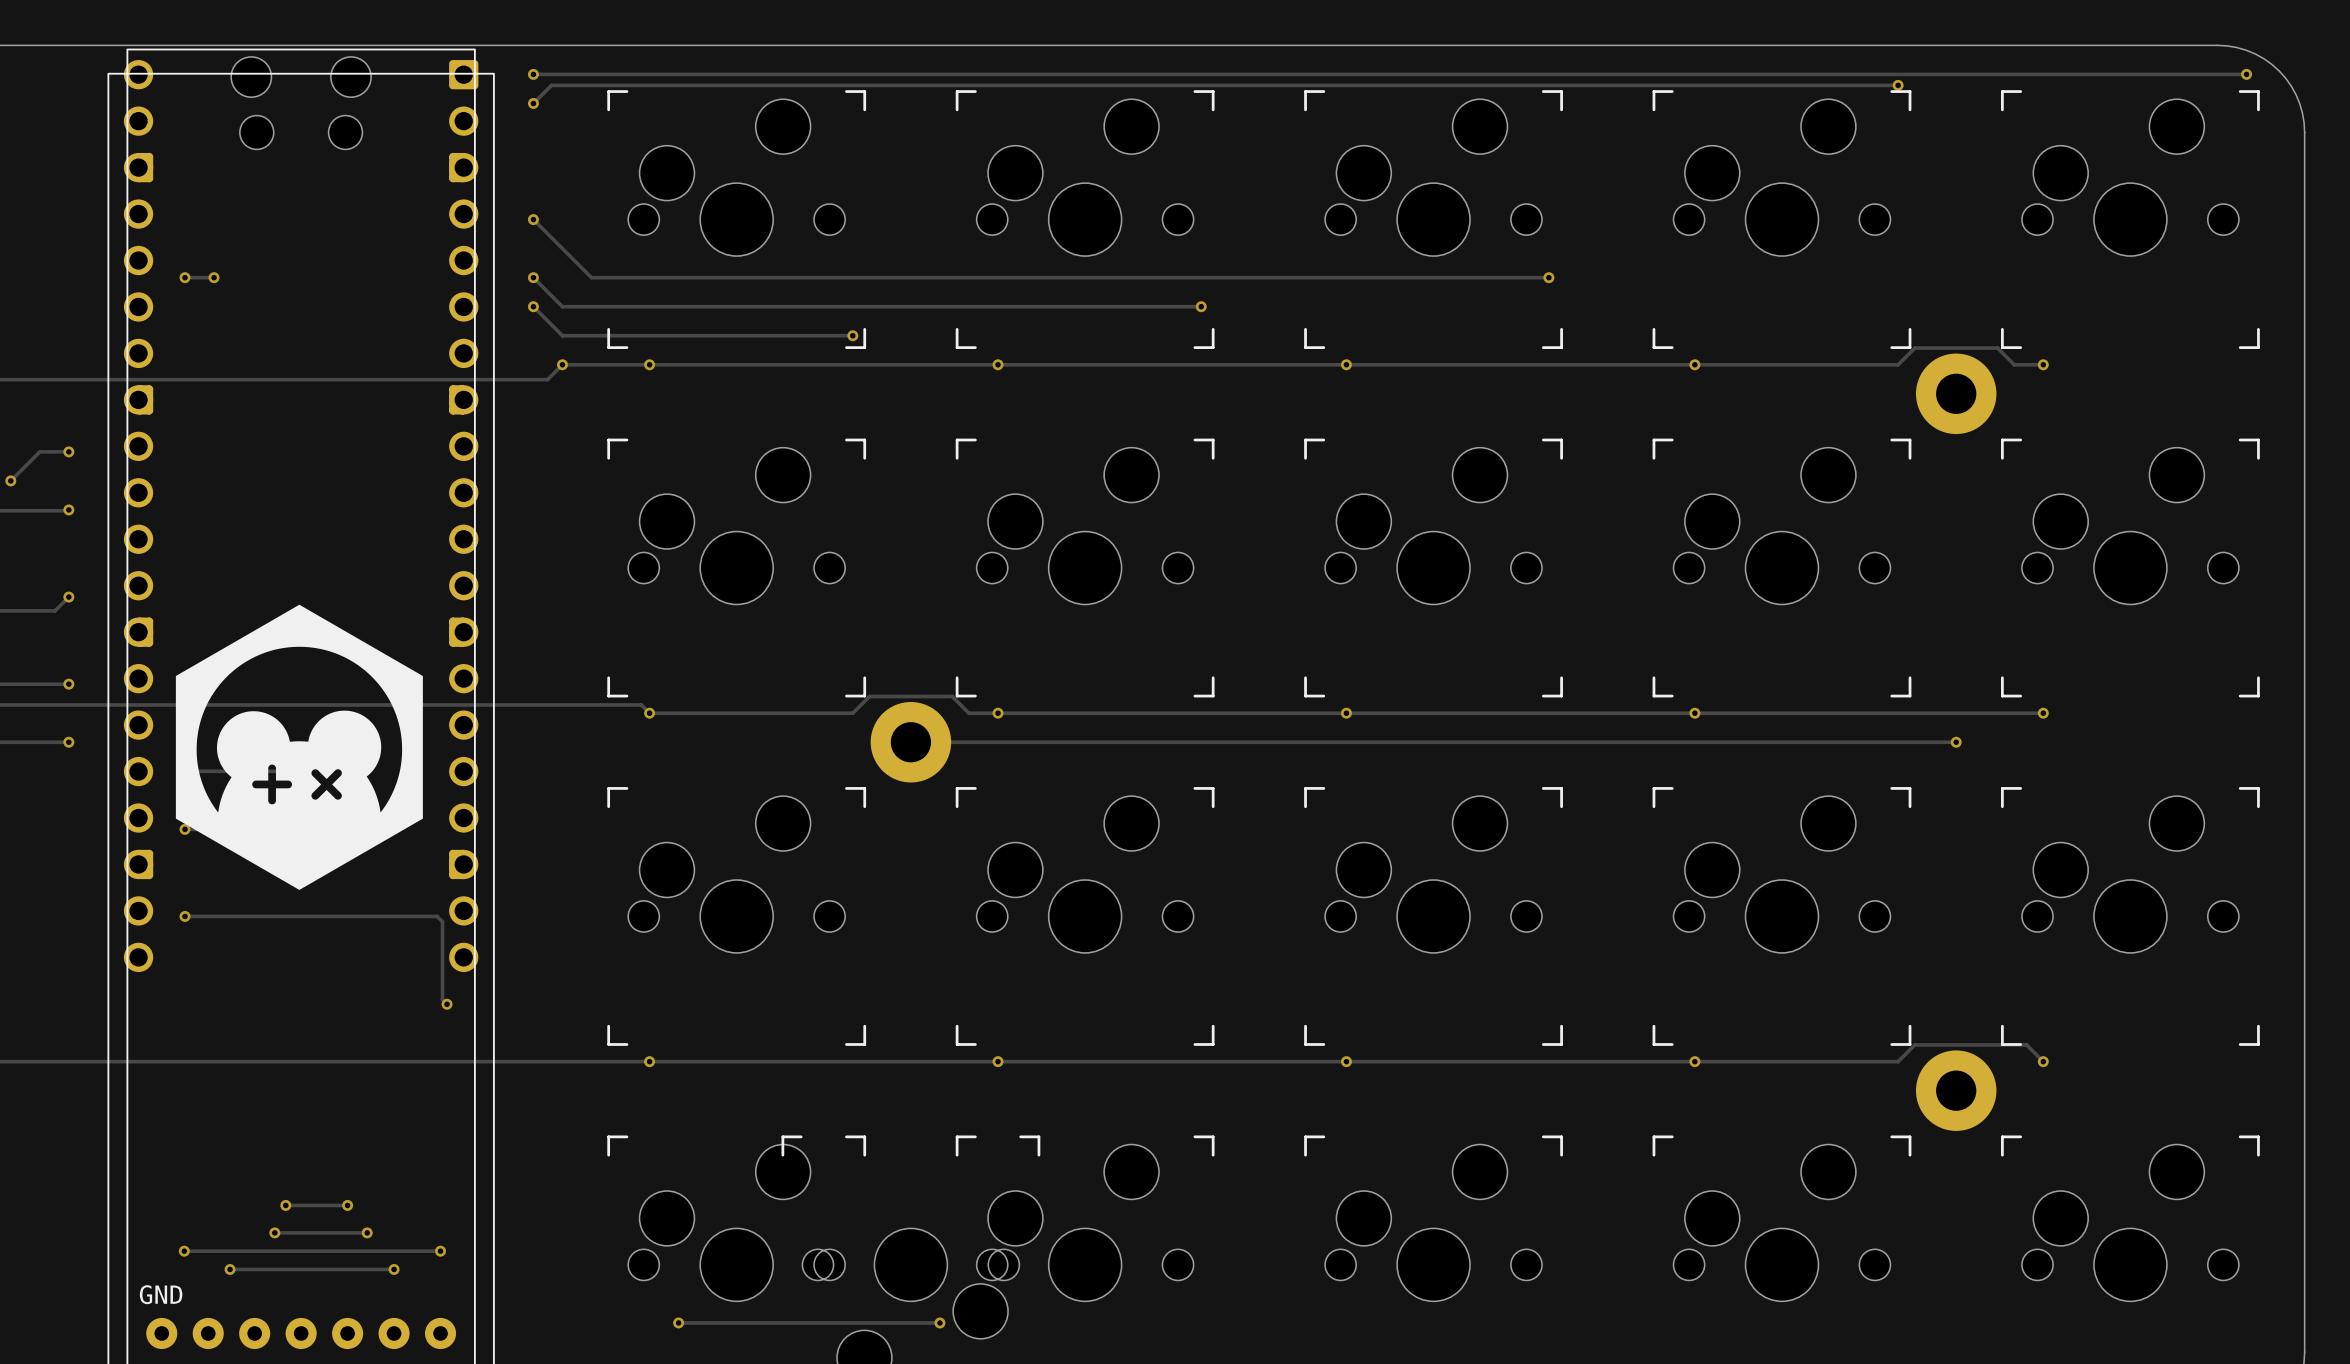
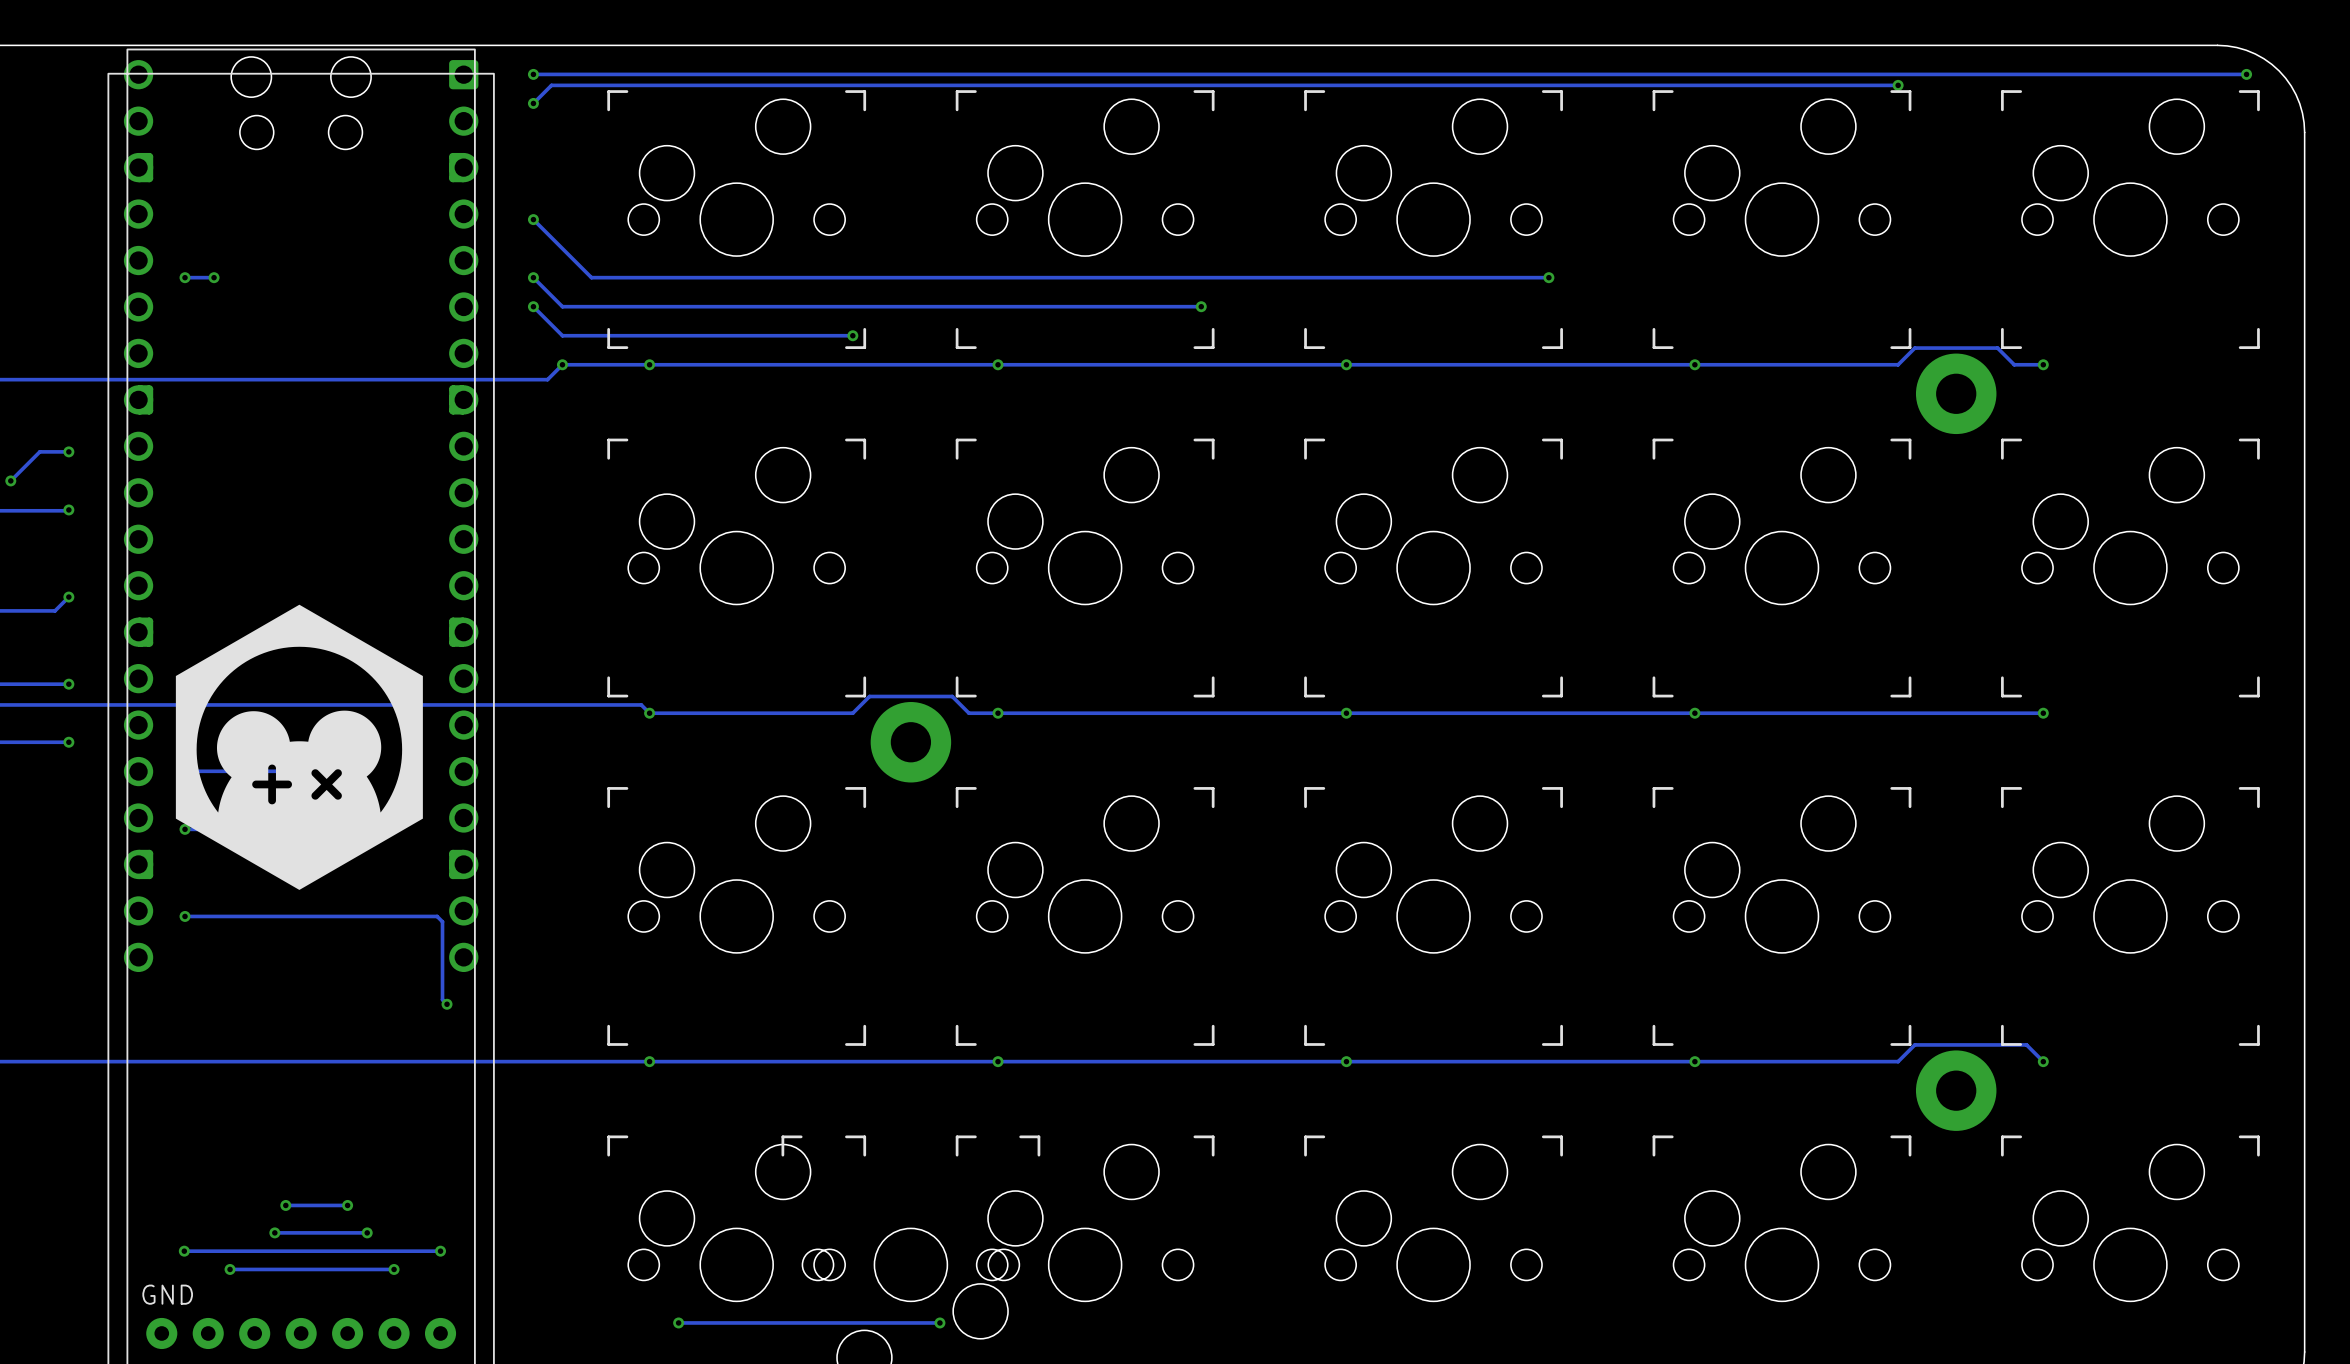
track: (1956, 742) (910, 742) -> none
via: (1956, 742) -> none

